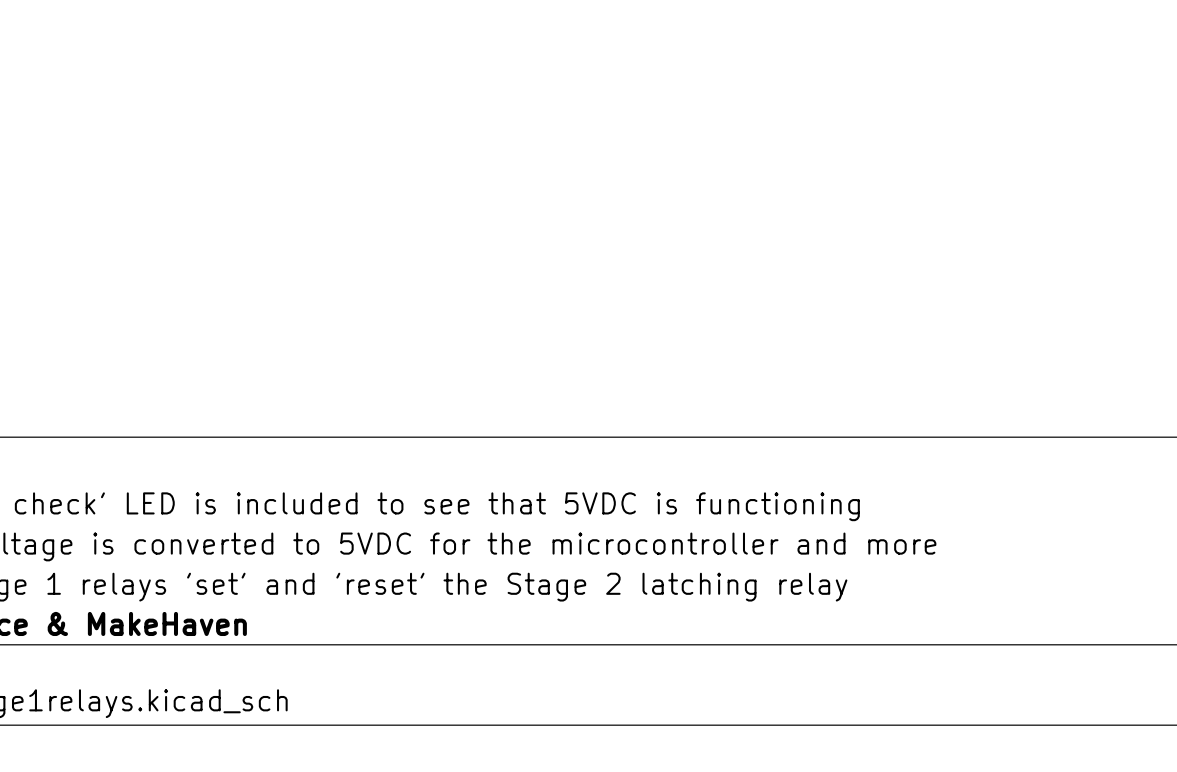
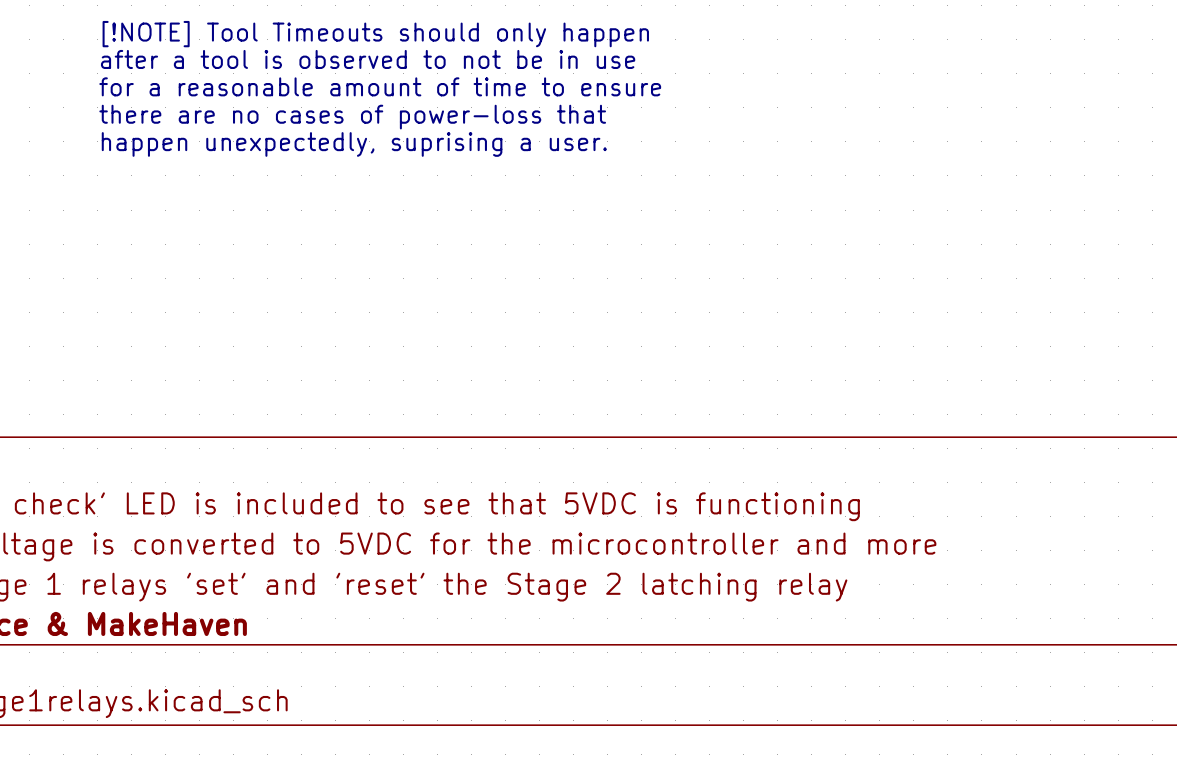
text: none -> [!NOTE] Tool Timeouts should only happen (375, 34)
text: none -> after a tool is observed to not be in use (368, 59)
text: none -> for a reasonable amount of time to ensure (380, 86)
text: none -> there are no cases of power-loss that (352, 117)
text: none -> happen unexpectedly, suprising a user. (354, 144)

